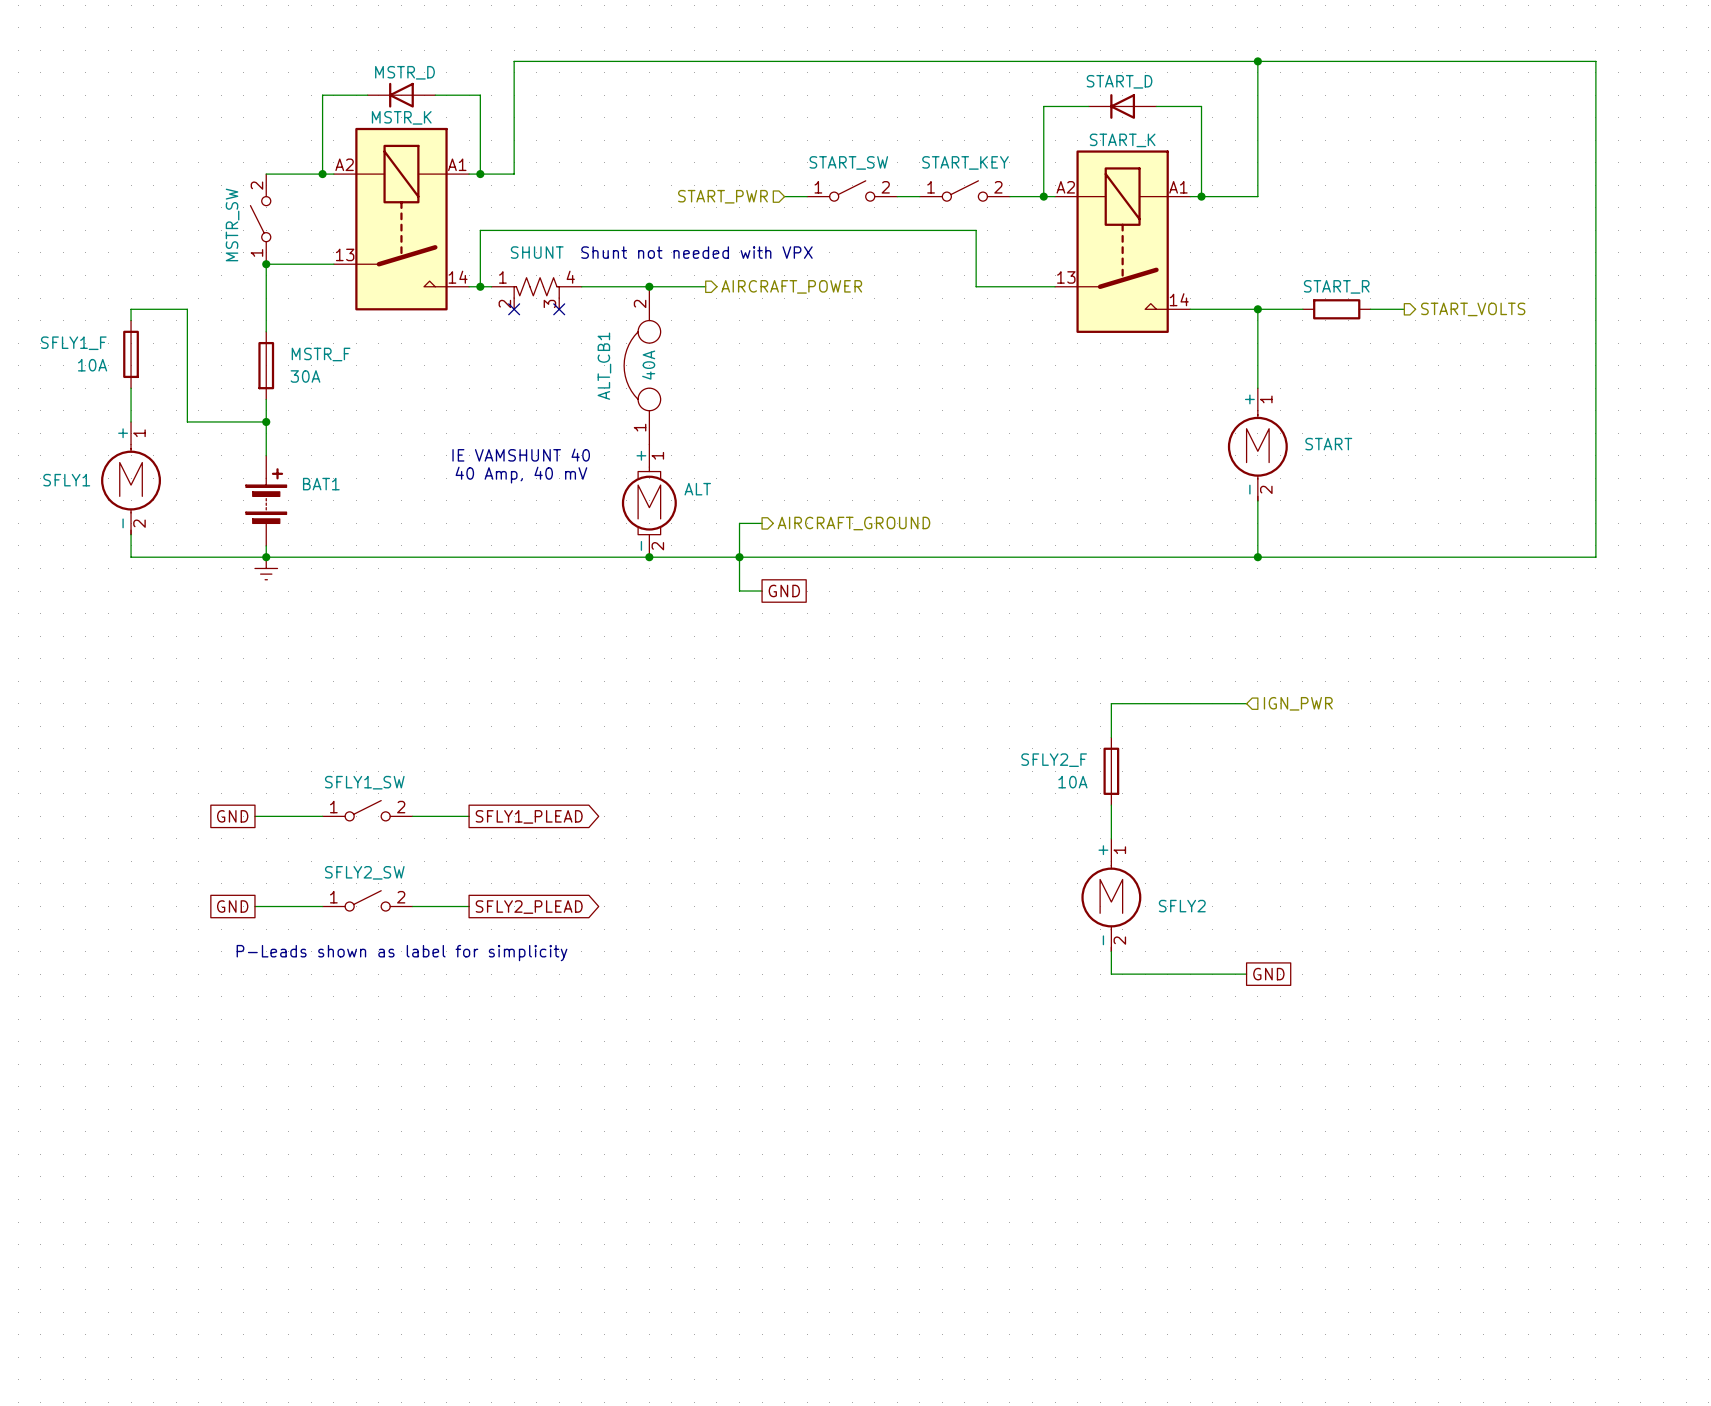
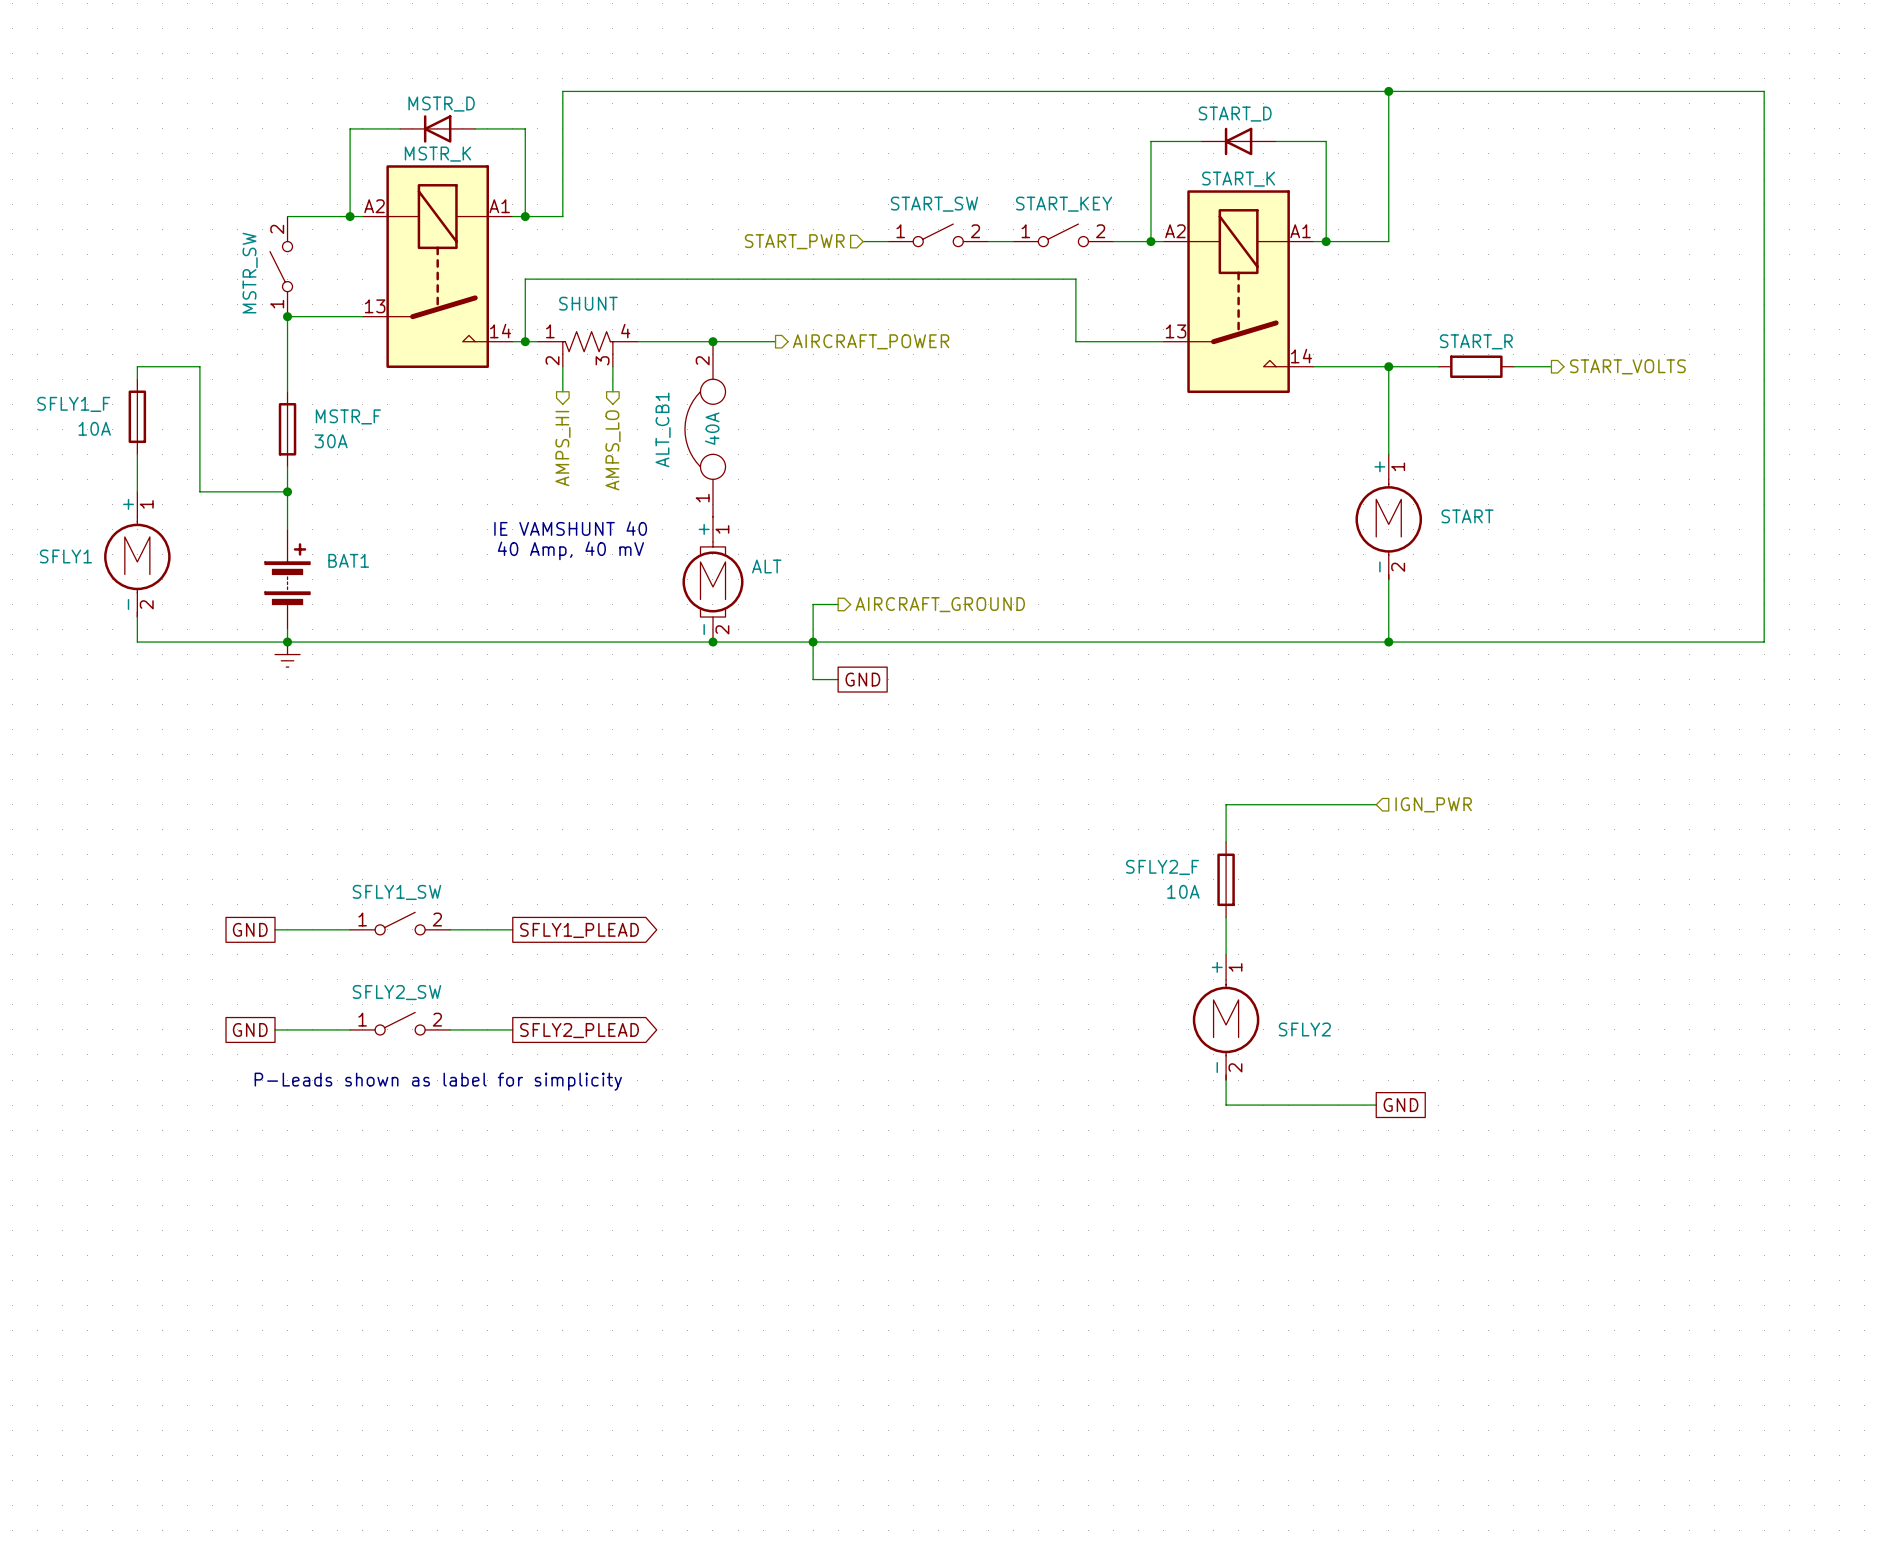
text: Shunt not needed with VPX (696, 252) -> none
wire: none -> (562, 366) (562, 391)
no-connect mark: (514, 309) -> none
wire: none -> (612, 366) (612, 391)
no-connect mark: (559, 309) -> none
hierarchical label: none -> AMPS_HI (562, 448)
hierarchical label: none -> AMPS_LO (613, 450)

